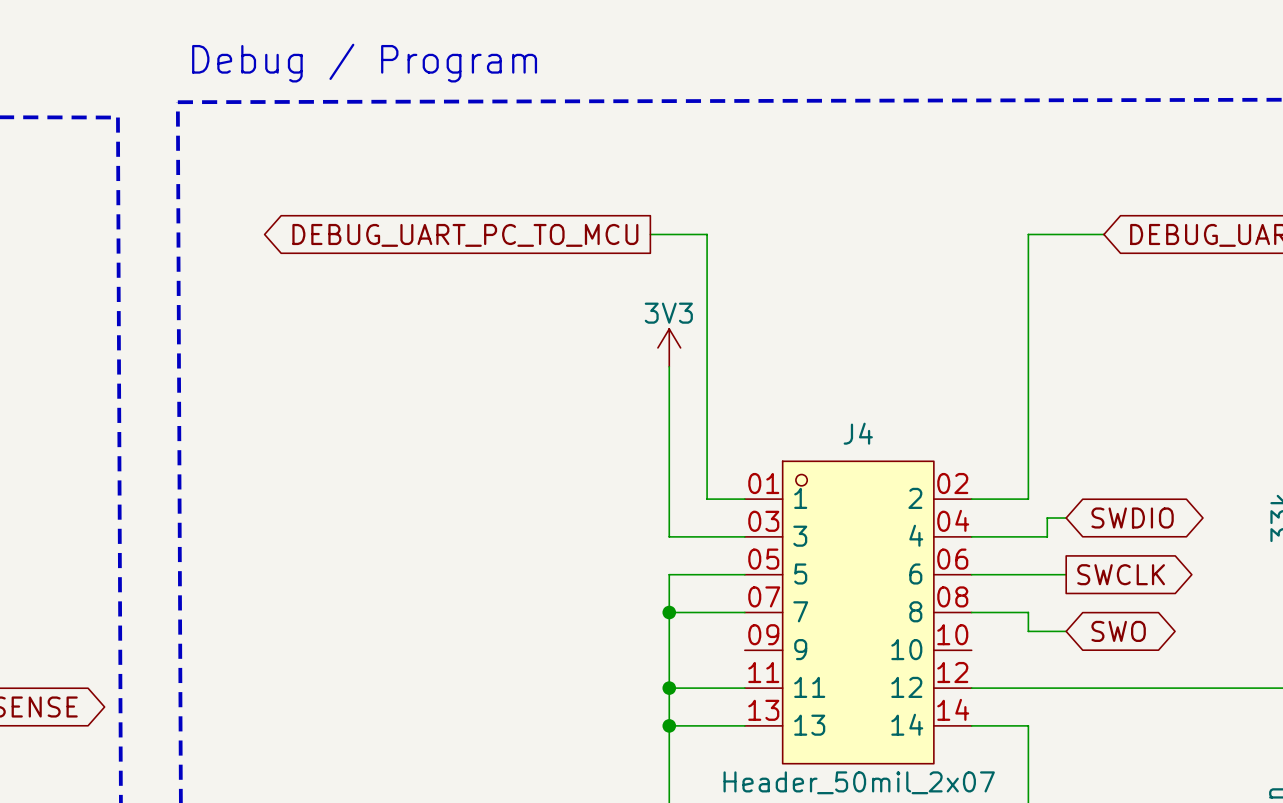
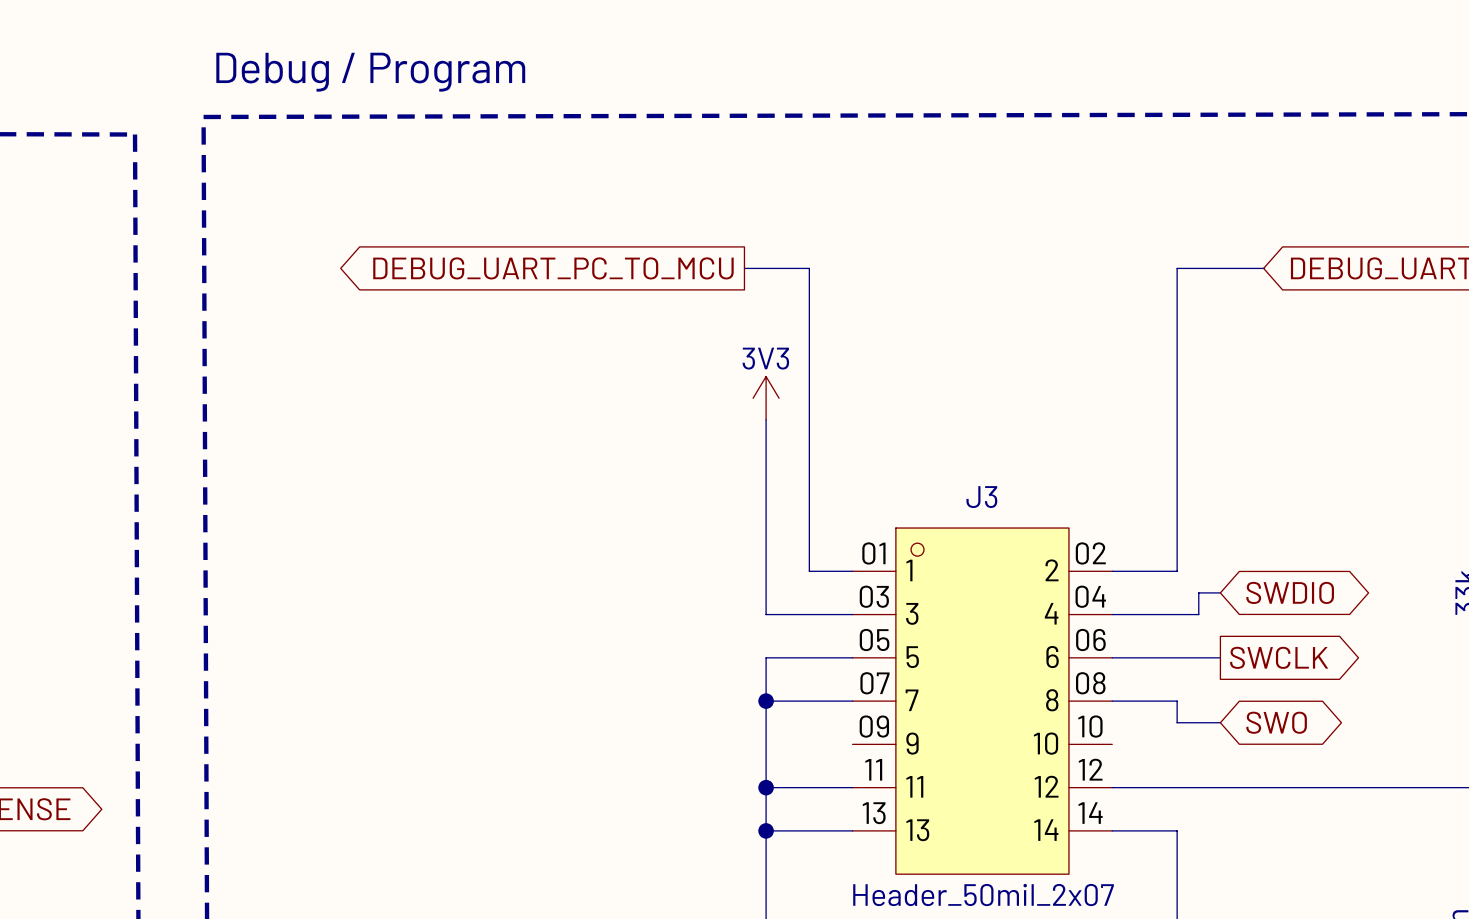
J4 name: J4 (858, 433) -> J3 (981, 497)

